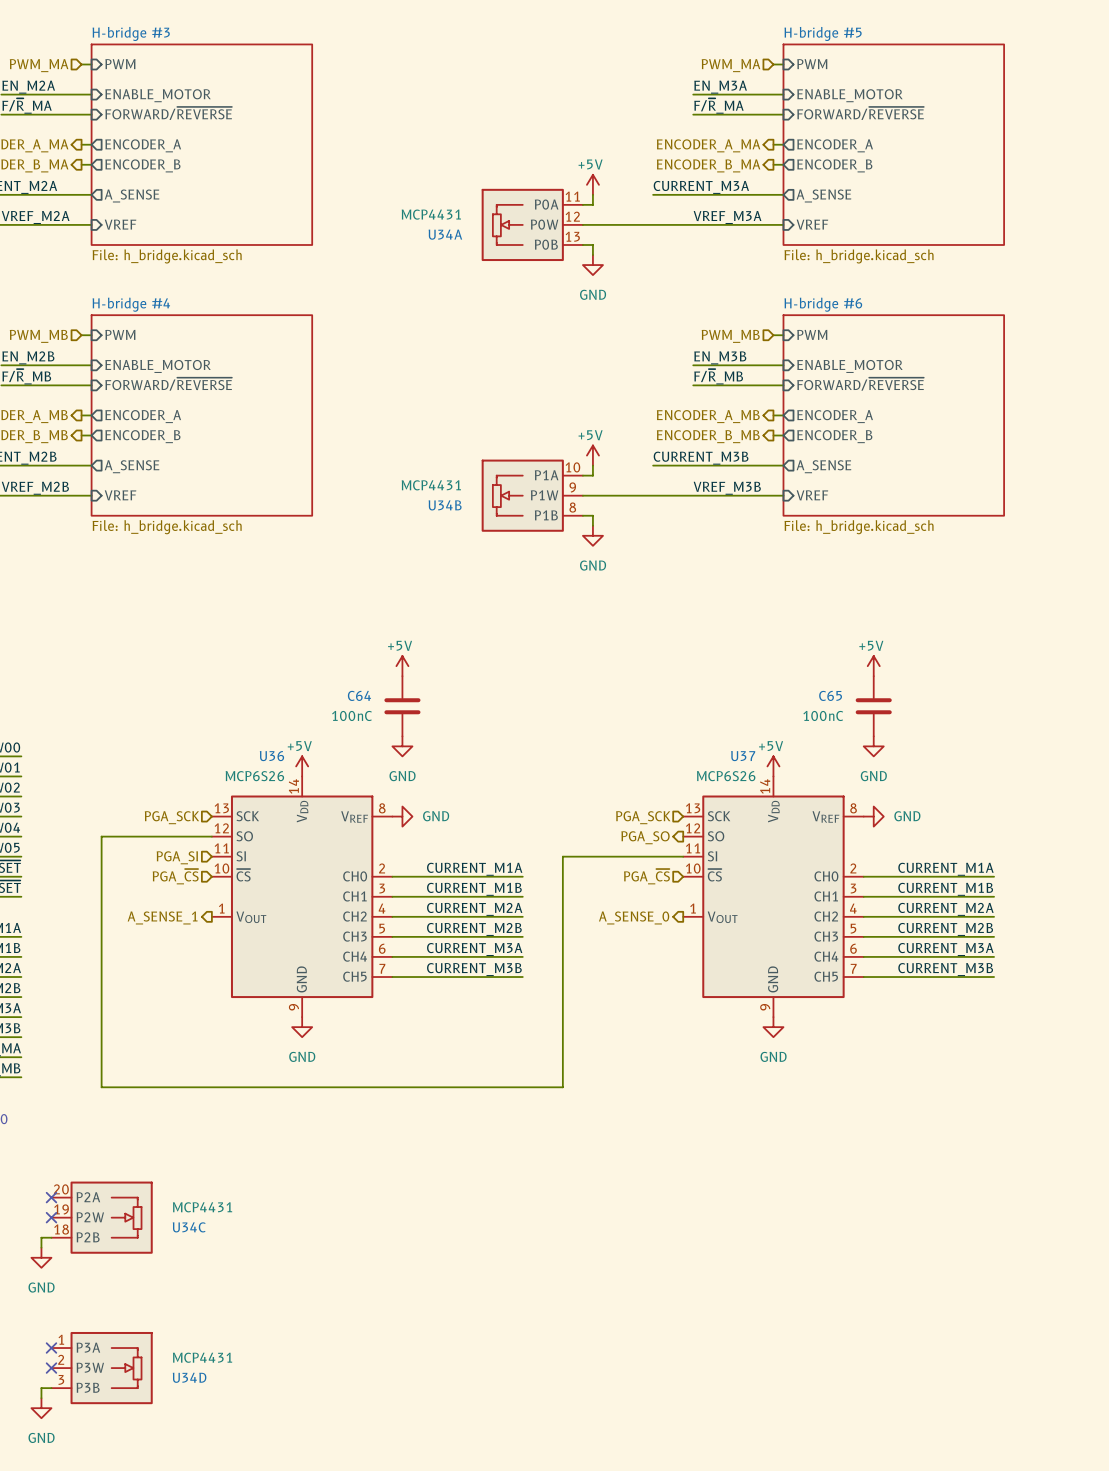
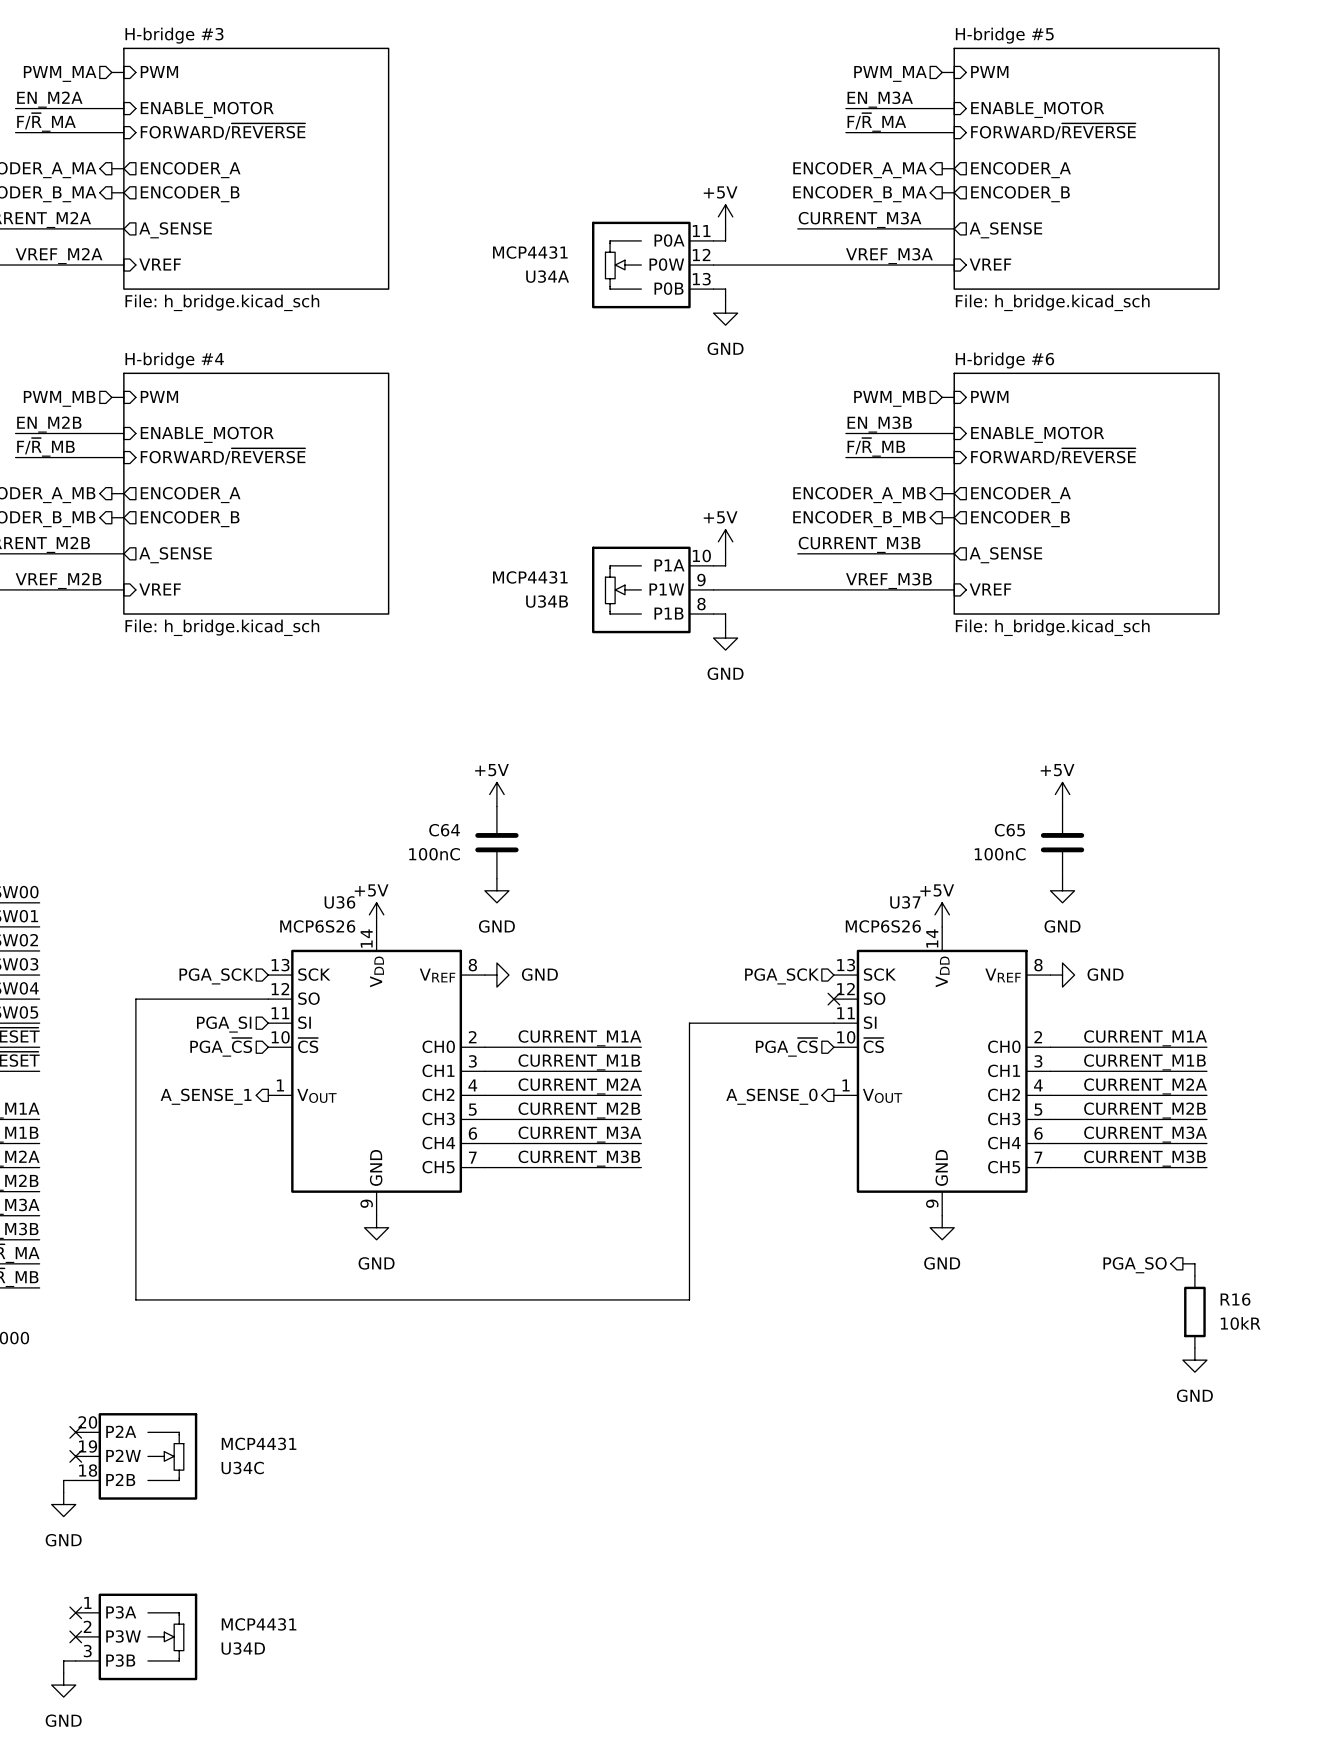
no-connect mark: none -> (833, 999)
hierarchical label: PGA_SO (645, 837) -> none
wire: none -> (1182, 1263) (1194, 1263) (1194, 1275)
hierarchical label: none -> PGA_SO (1135, 1265)
R16: none -> 10kR (1194, 1311)
power symbol: none -> GND (1194, 1360)

